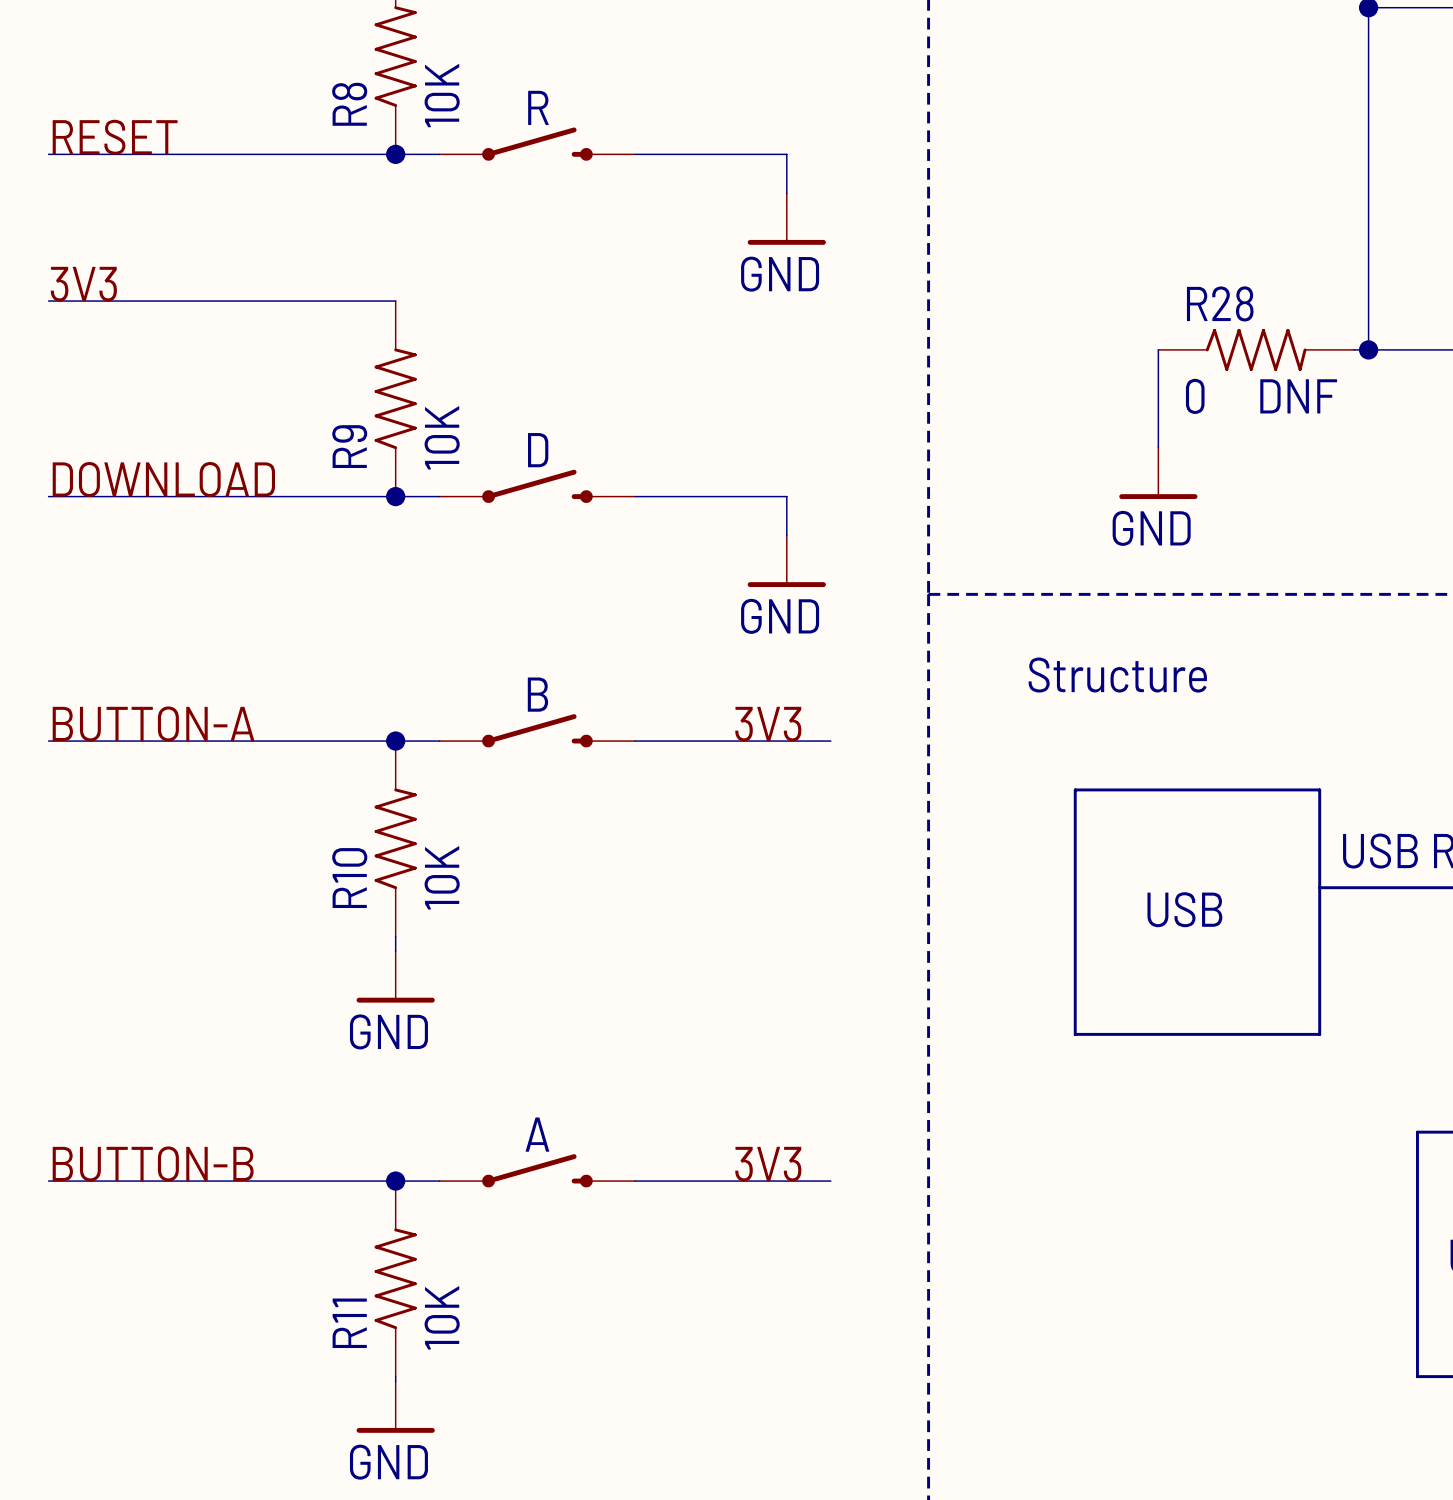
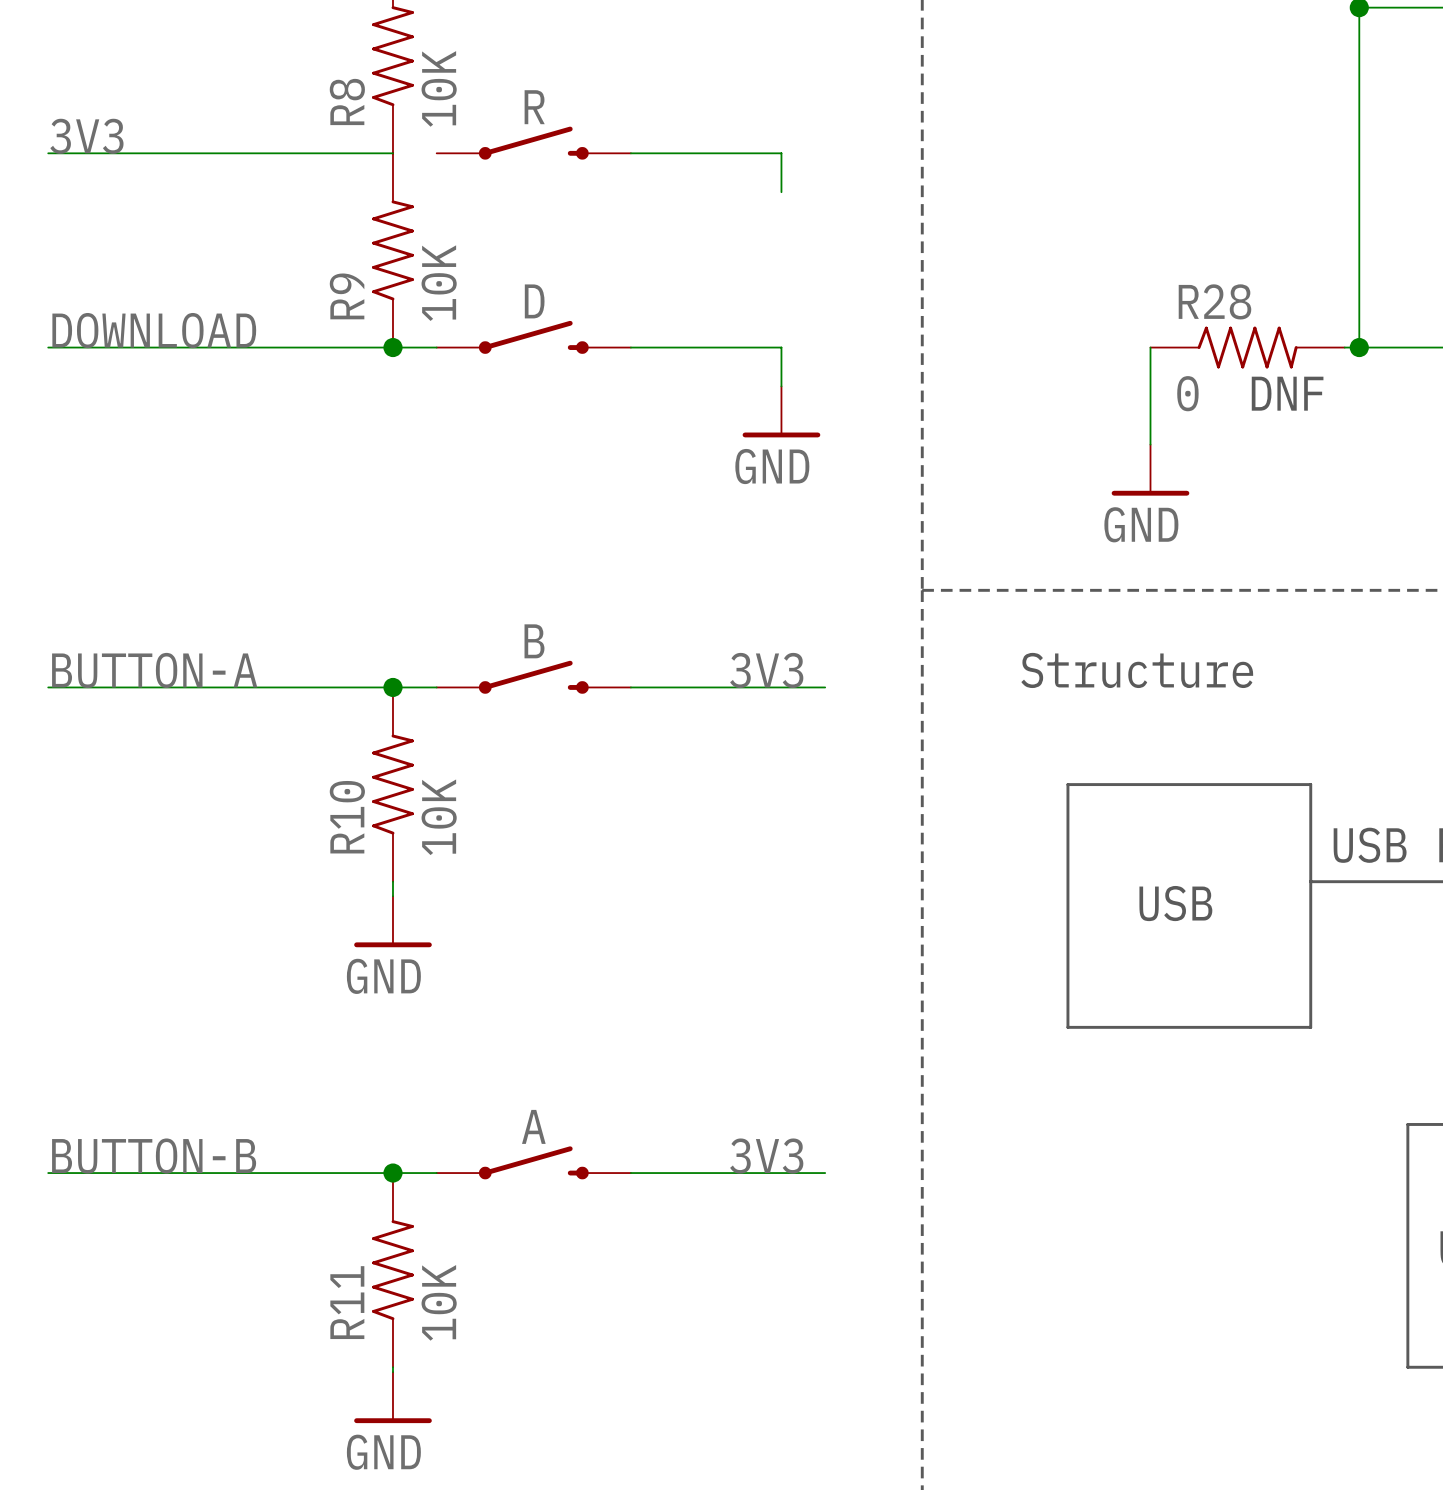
label: RESET (115, 137) -> 3V3 (86, 136)
wire: (395, 154) (439, 154) -> none
junction: (395, 154) -> none
power symbol: GND (786, 219) -> none
label: 3V3 (83, 284) -> none
wire: (48, 301) (395, 301) -> none
junction: none -> (392, 347)
R9 position: (395, 398) -> (392, 250)
power symbol: none -> GND (781, 411)
label position: DOWNLOAD (163, 479) -> DOWNLOAD (154, 330)
D position: (537, 486) -> (533, 337)
wire: (48, 496) (439, 496) -> (48, 347) (436, 347)
junction: (395, 496) -> none
wire: (635, 496) (786, 496) (786, 535) -> (630, 347) (781, 347) (781, 386)
power symbol: GND (786, 561) -> none
label position: BUTTON-A (153, 723) -> BUTTON-A (154, 670)
label position: 3V3 (768, 724) -> 3V3 (766, 670)
B position: (537, 730) -> (533, 677)
wire: (48, 741) (439, 741) -> (48, 687) (436, 687)
junction position: (395, 741) -> (392, 687)
wire: (635, 741) (830, 741) -> (630, 687) (825, 687)
R10 position: (395, 838) -> (392, 784)
power symbol position: GND (395, 976) -> GND (392, 921)

